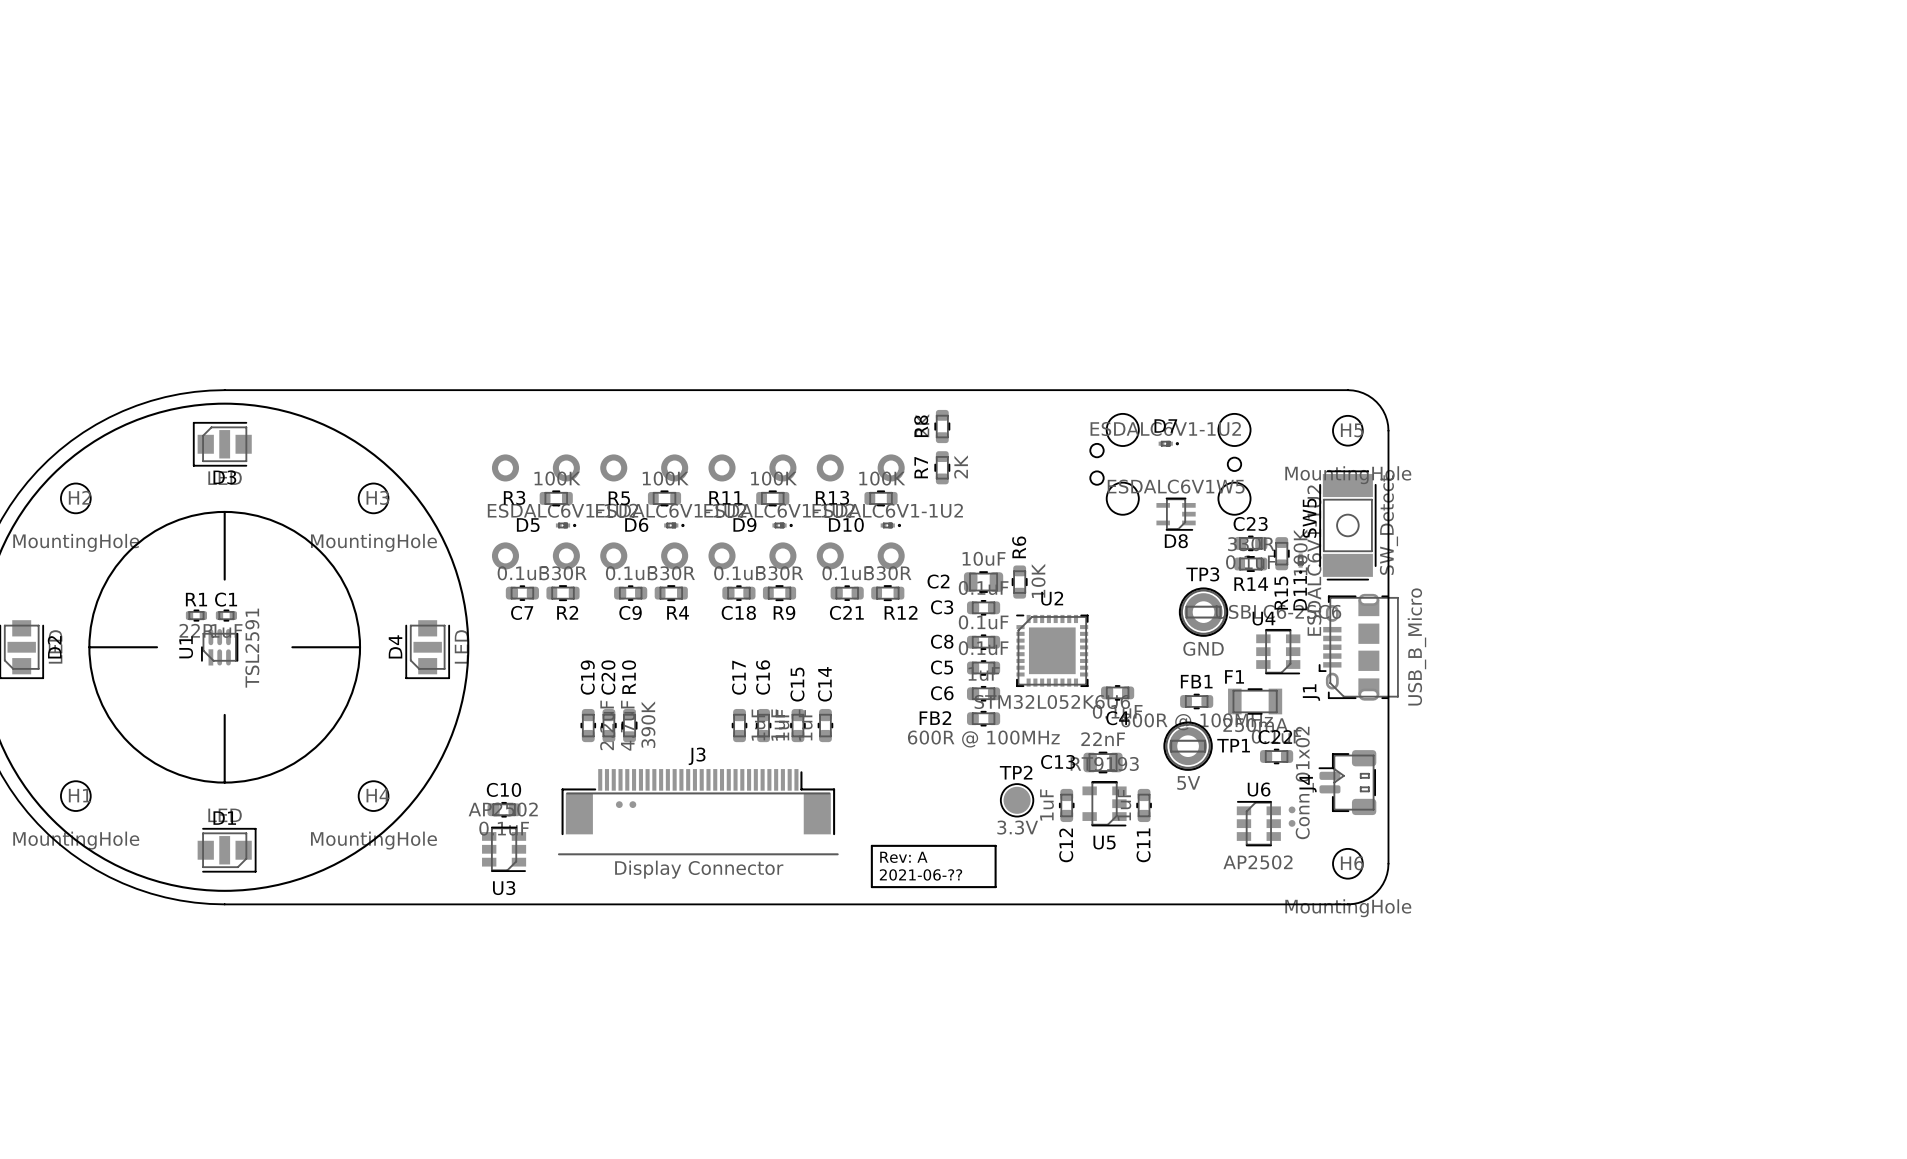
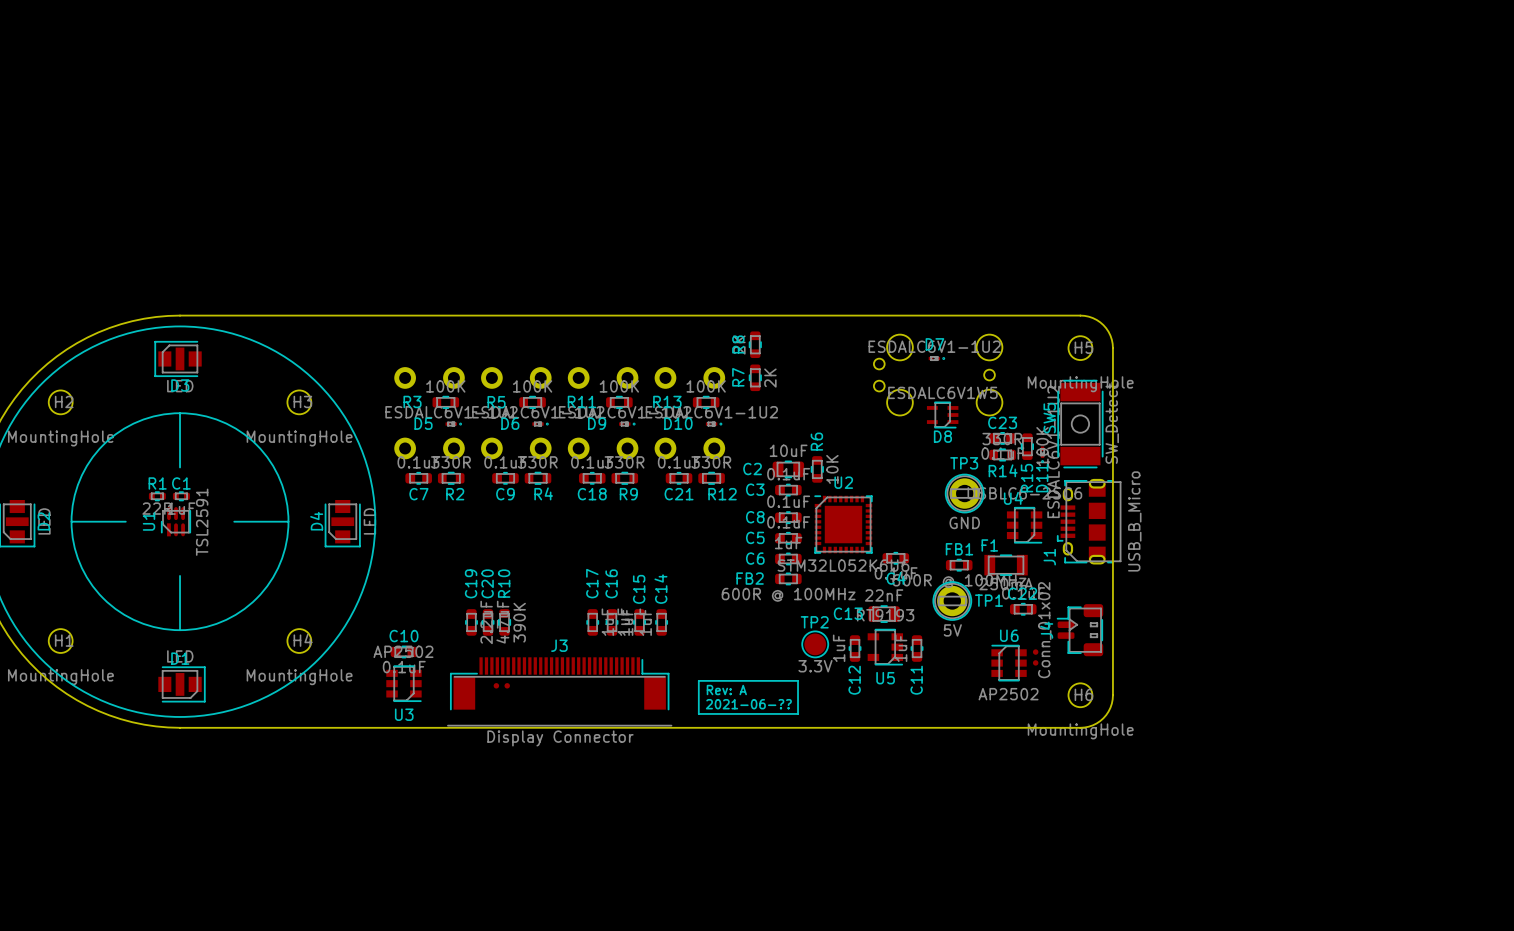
C19 position: (588, 725) -> (471, 622)
C20 position: (608, 725) -> (488, 622)
R10 position: (629, 725) -> (504, 622)
C17 position: (739, 725) -> (592, 622)
C16 position: (763, 725) -> (612, 622)
C15 position: (797, 725) -> (639, 622)
C14 position: (825, 725) -> (661, 622)
part position: (626, 804) -> (501, 685)
J3 position: (698, 812) -> (559, 691)

